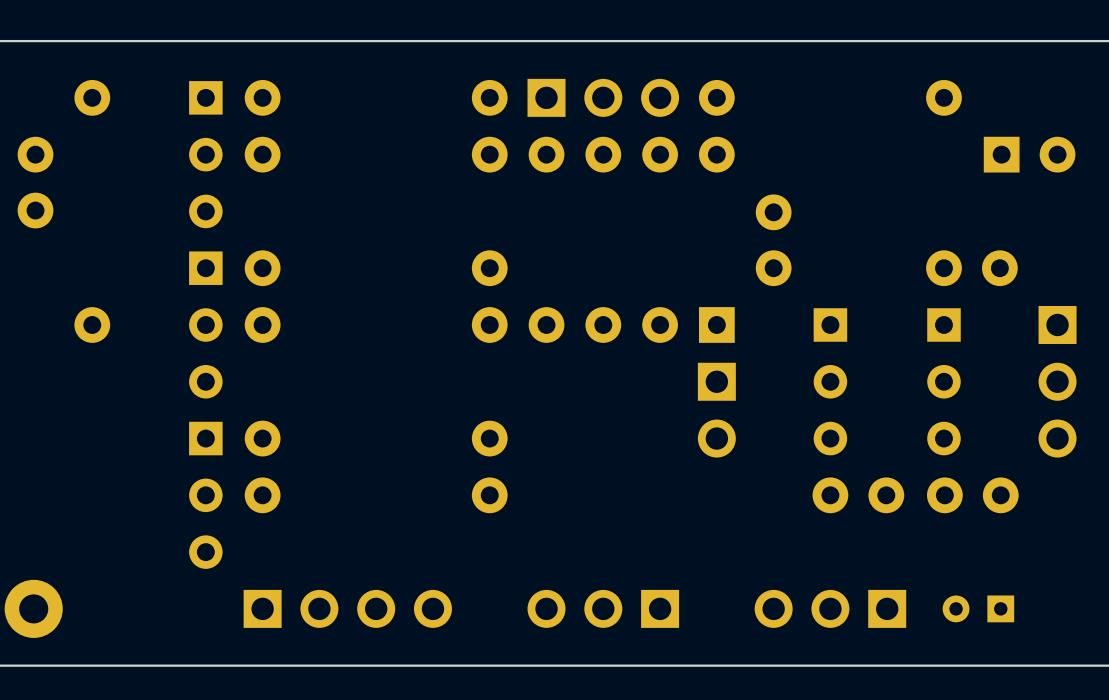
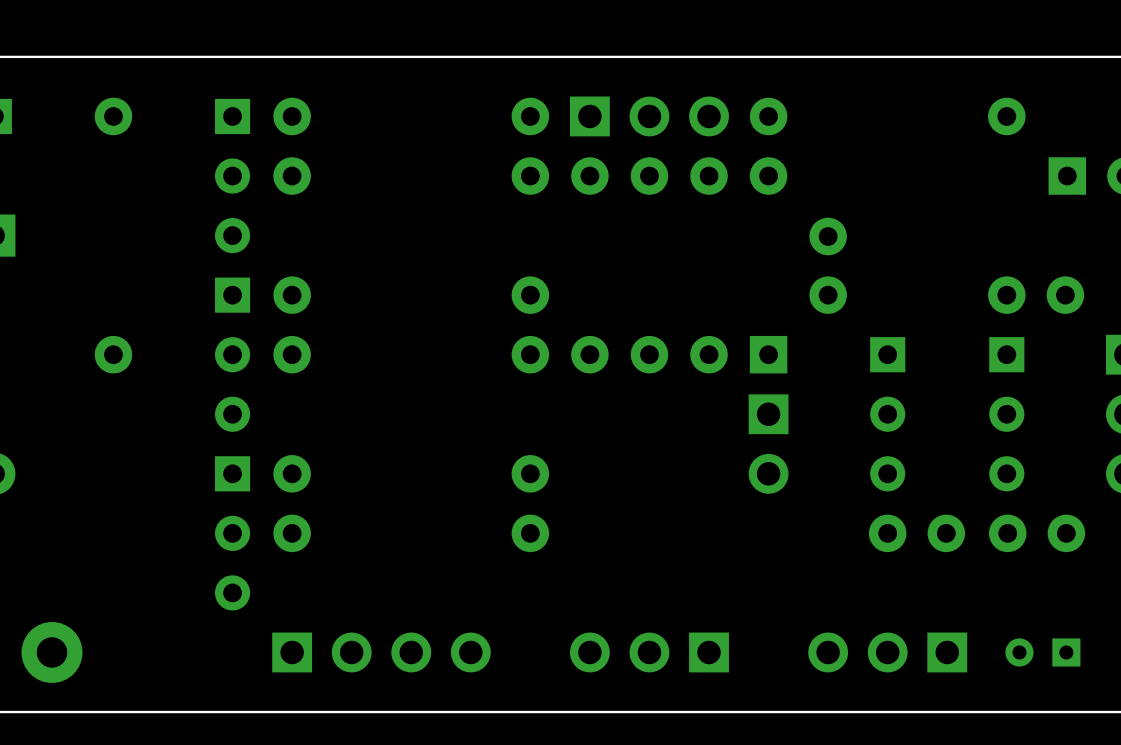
part: (35, 182) -> none

